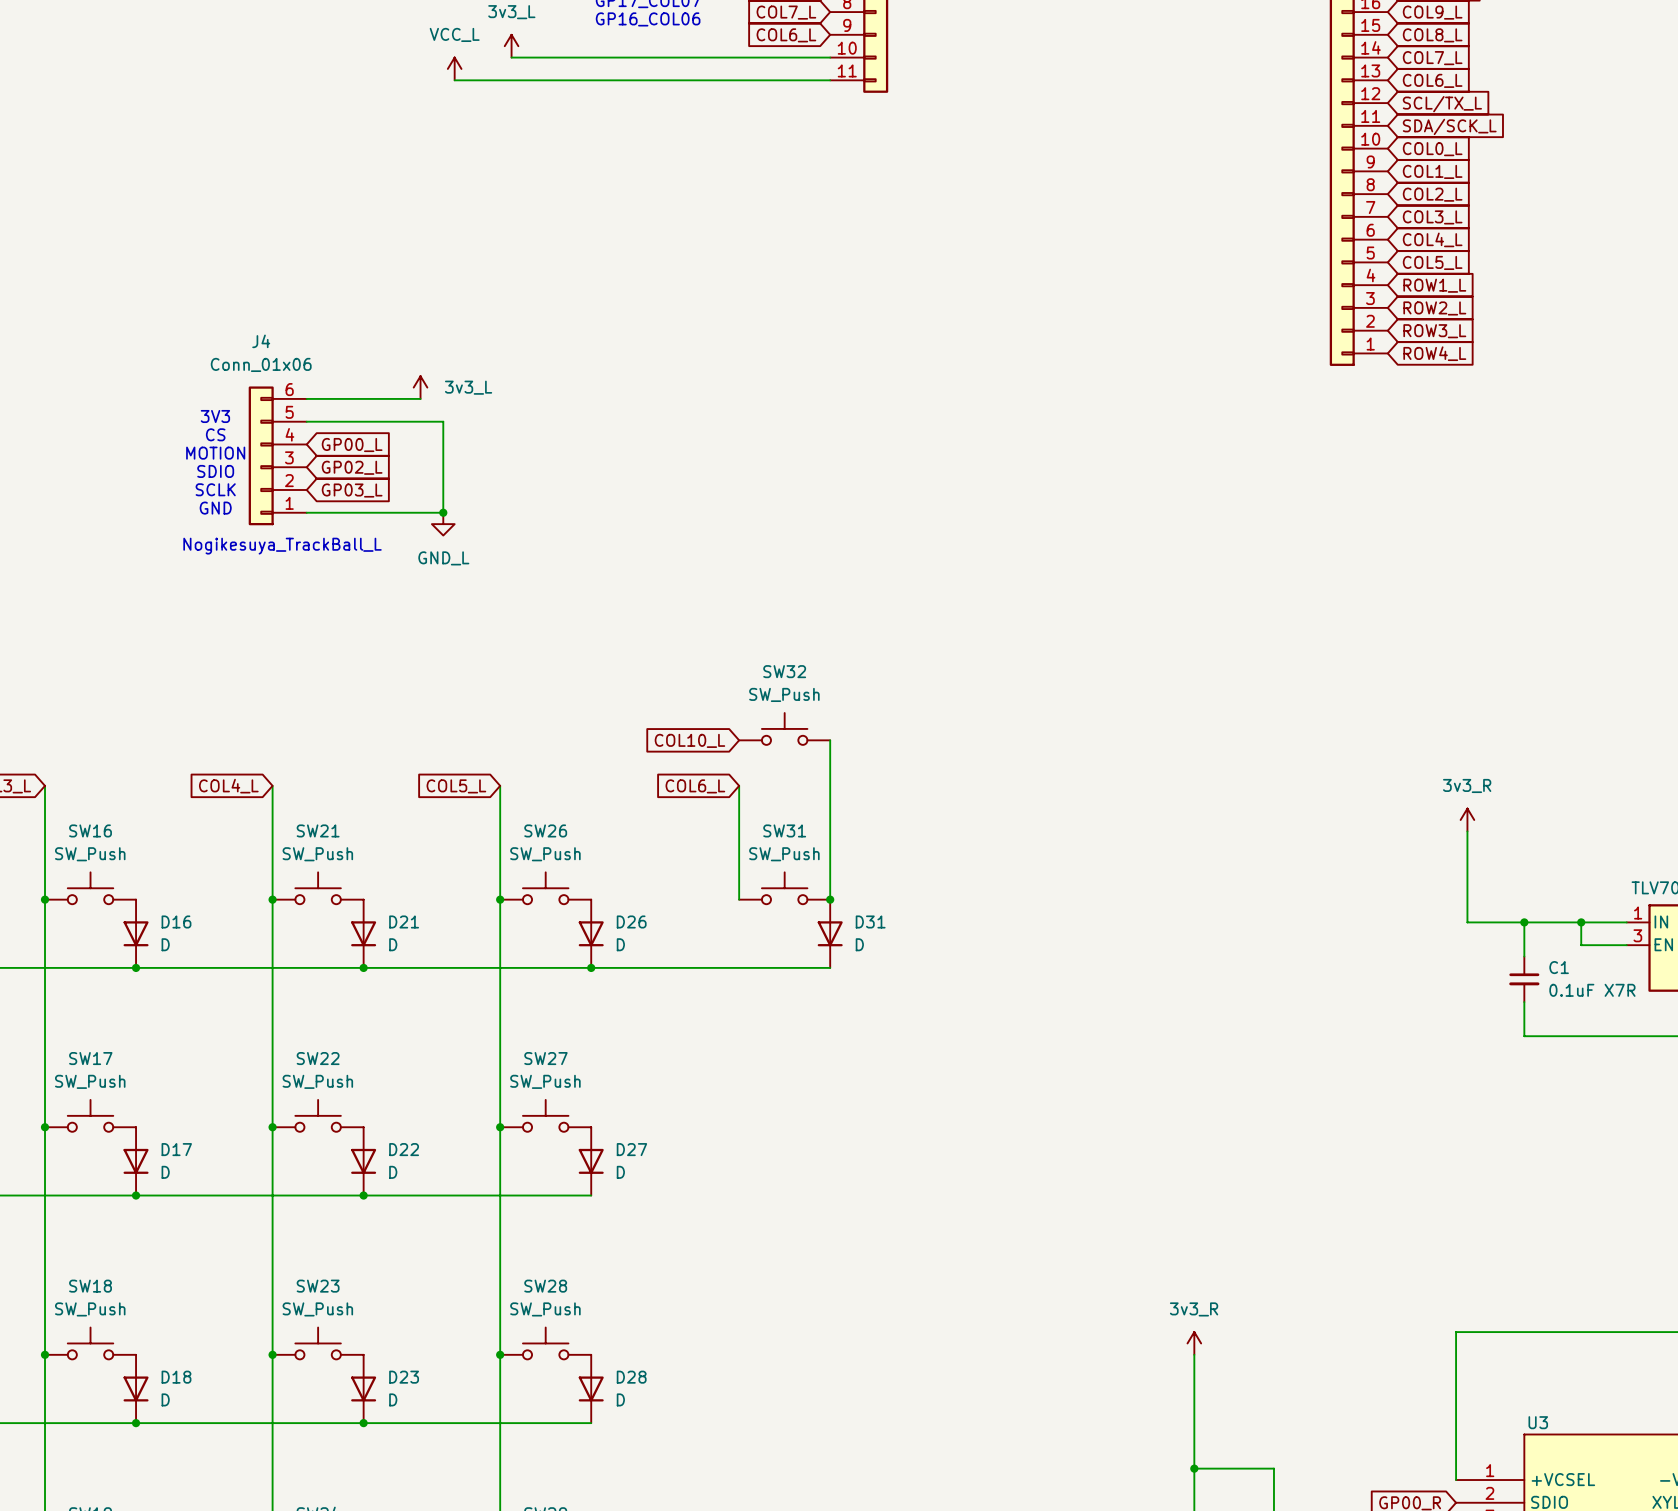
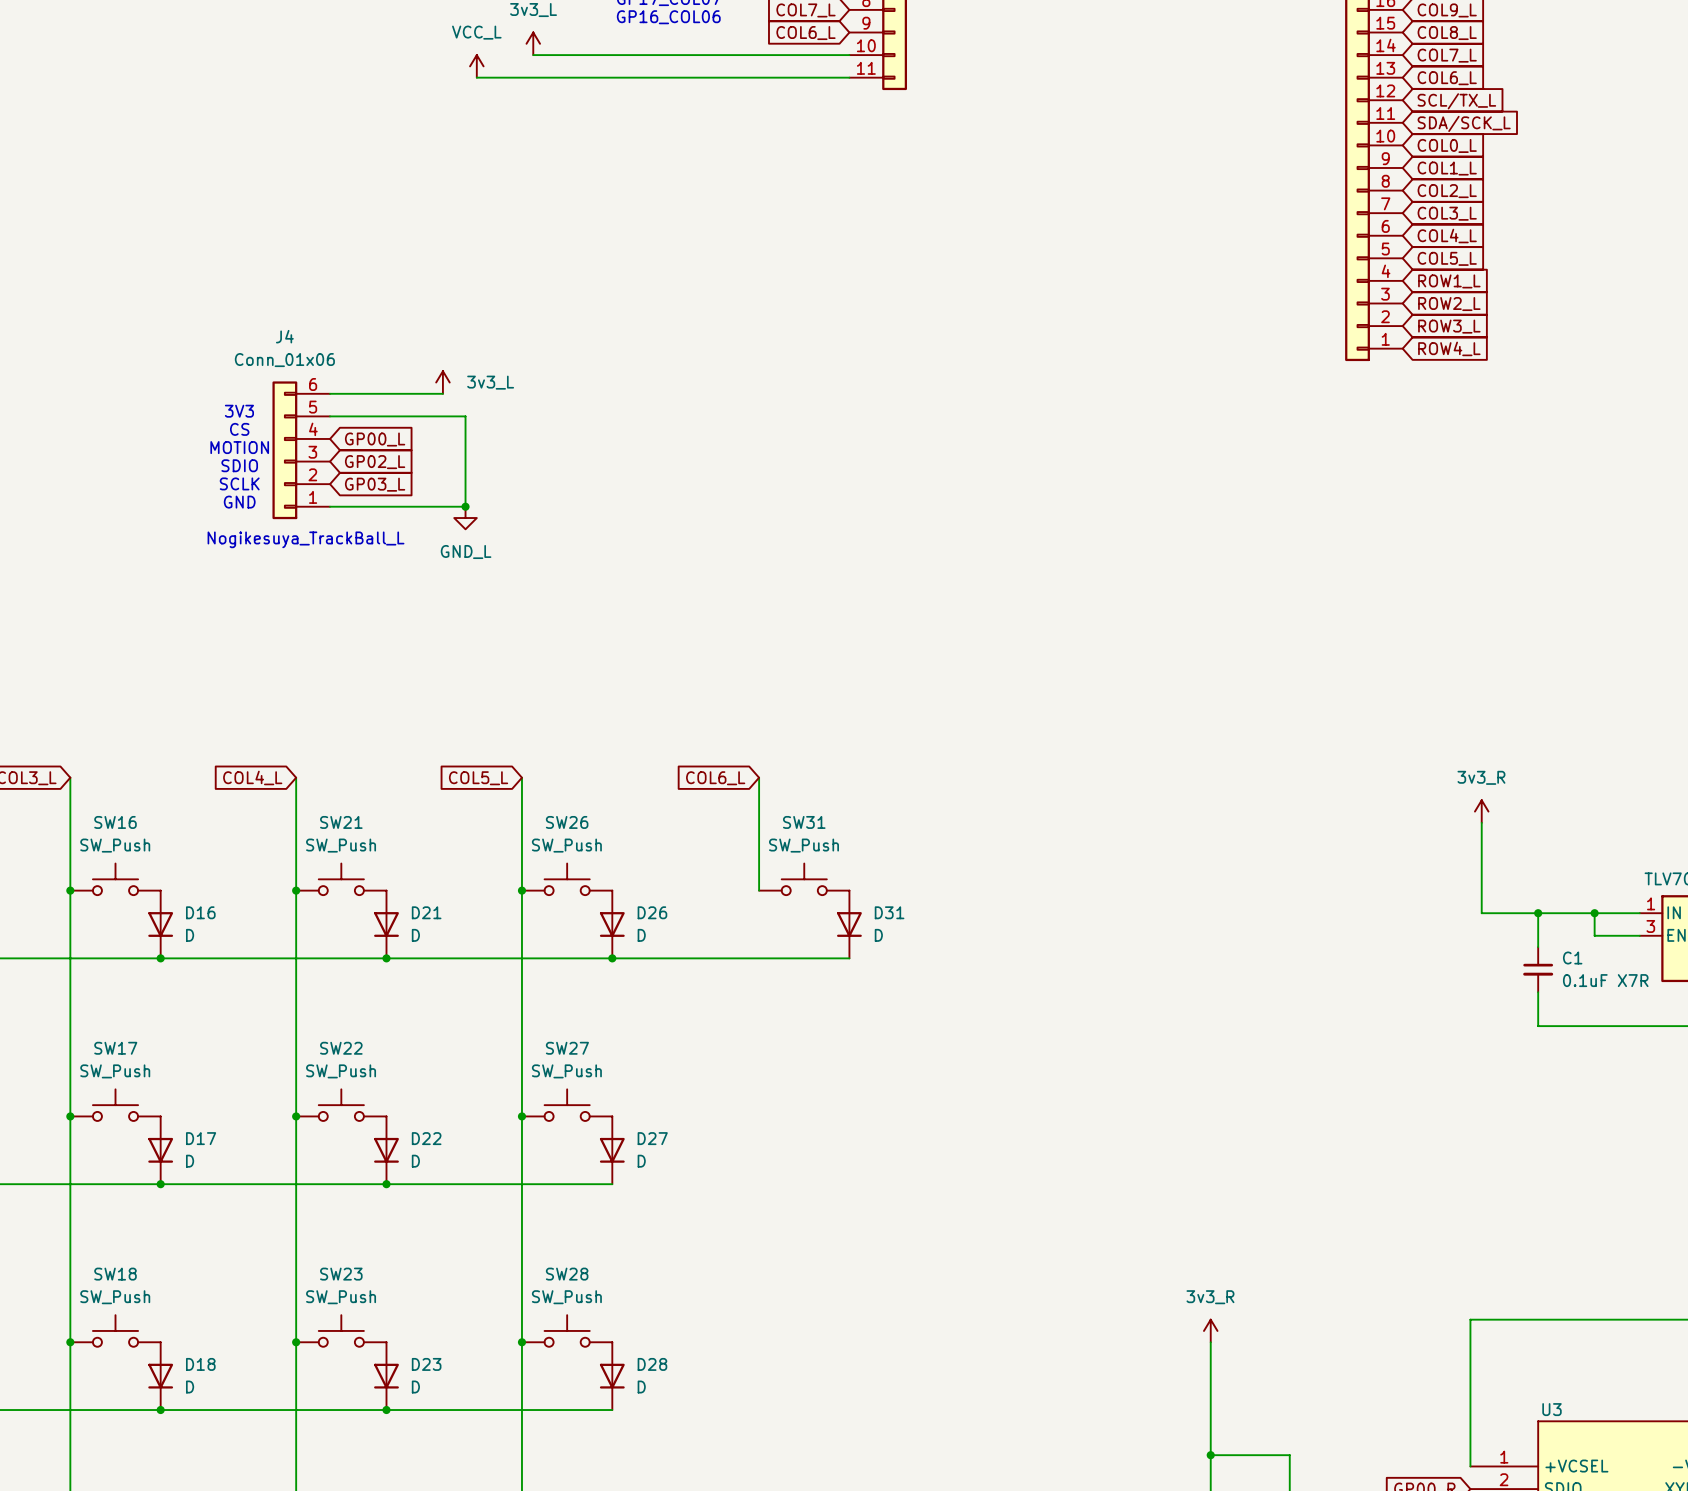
SW32: SW_Push (784, 728) -> none
global label: COL10_L (689, 740) -> none
wire: (830, 740) (830, 899) -> none
junction: (830, 899) -> none

